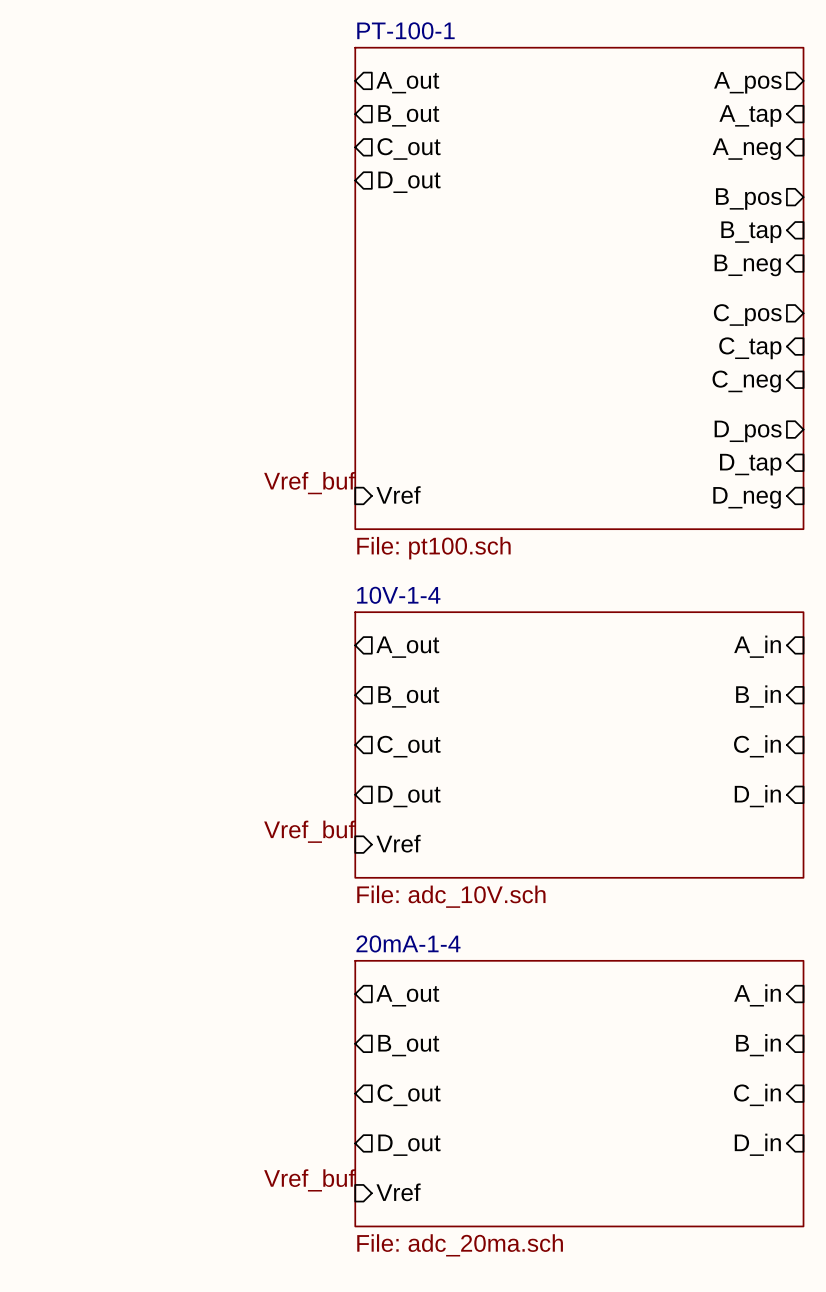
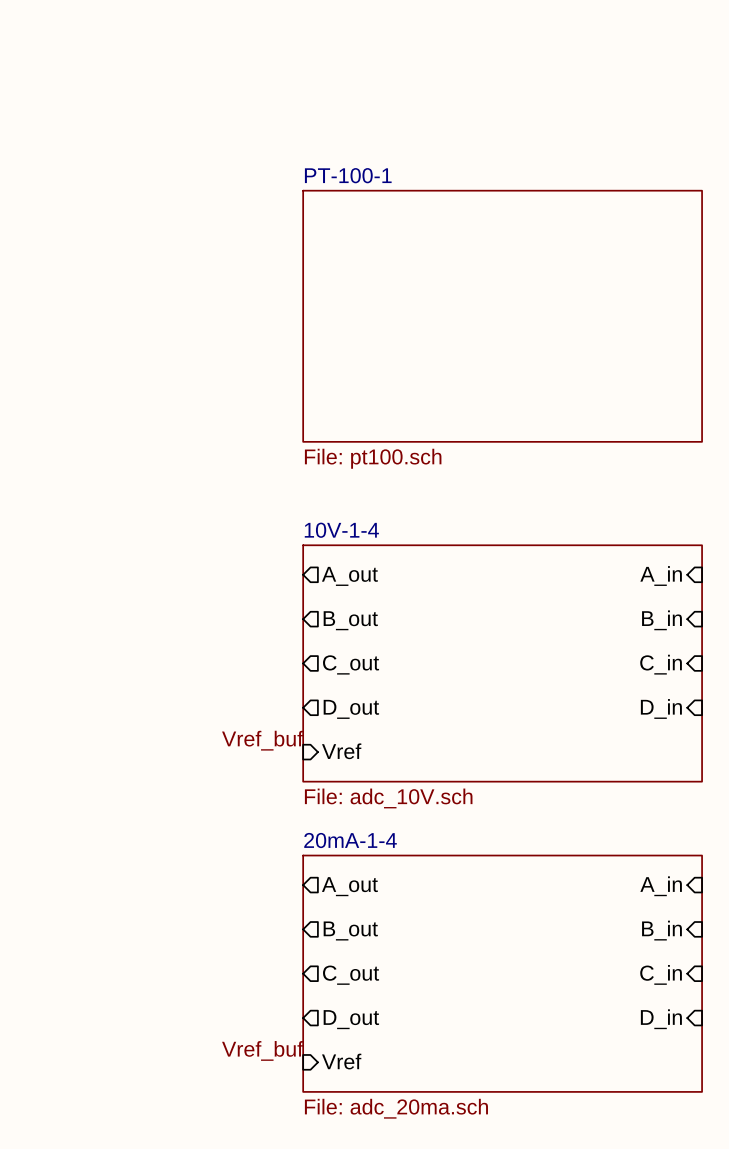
sheet PT-100-1 name position: PT-100-1 (405, 30) -> PT-100-1 (348, 175)
sheet PT-100-1 shape: [355, 47, 804, 530] -> [303, 190, 703, 442]
sheet pin: A_out (407, 82) -> none
sheet pin: A_pos (747, 82) -> none
sheet pin: B_out (408, 115) -> none
sheet pin: A_tap (750, 116) -> none
sheet pin: C_out (409, 148) -> none
sheet pin: A_neg (746, 149) -> none
sheet pin: D_out (409, 182) -> none
sheet pin: B_pos (748, 199) -> none
sheet pin: B_tap (751, 232) -> none
sheet pin: B_neg (747, 265) -> none
sheet pin: C_pos (747, 315) -> none
sheet pin: C_tap (750, 348) -> none
sheet pin: C_neg (746, 381) -> none
sheet pin: D_pos (748, 431) -> none
sheet pin: D_tap (750, 464) -> none
label: Vref_buf (309, 483) -> none
sheet pin: Vref (398, 495) -> none
sheet pin: D_neg (747, 497) -> none
sheet PT-100-1 value position: File: pt100.sch (433, 548) -> File: pt100.sch (373, 458)

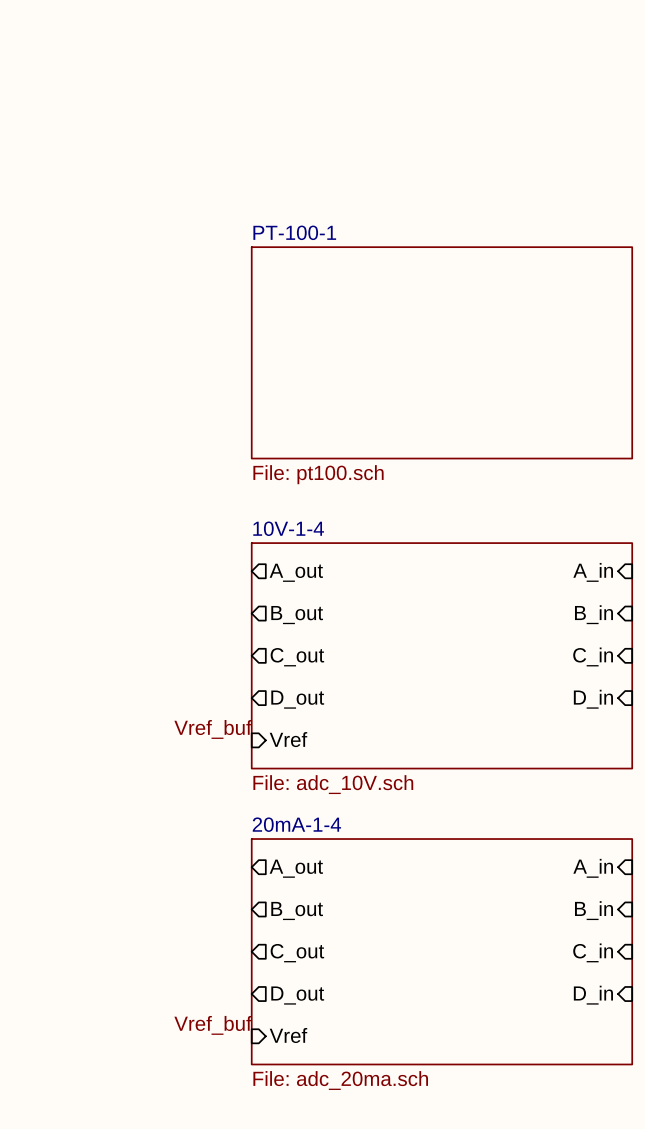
sheet PT-100-1 shape: [303, 190, 703, 442] -> [251, 247, 633, 459]

